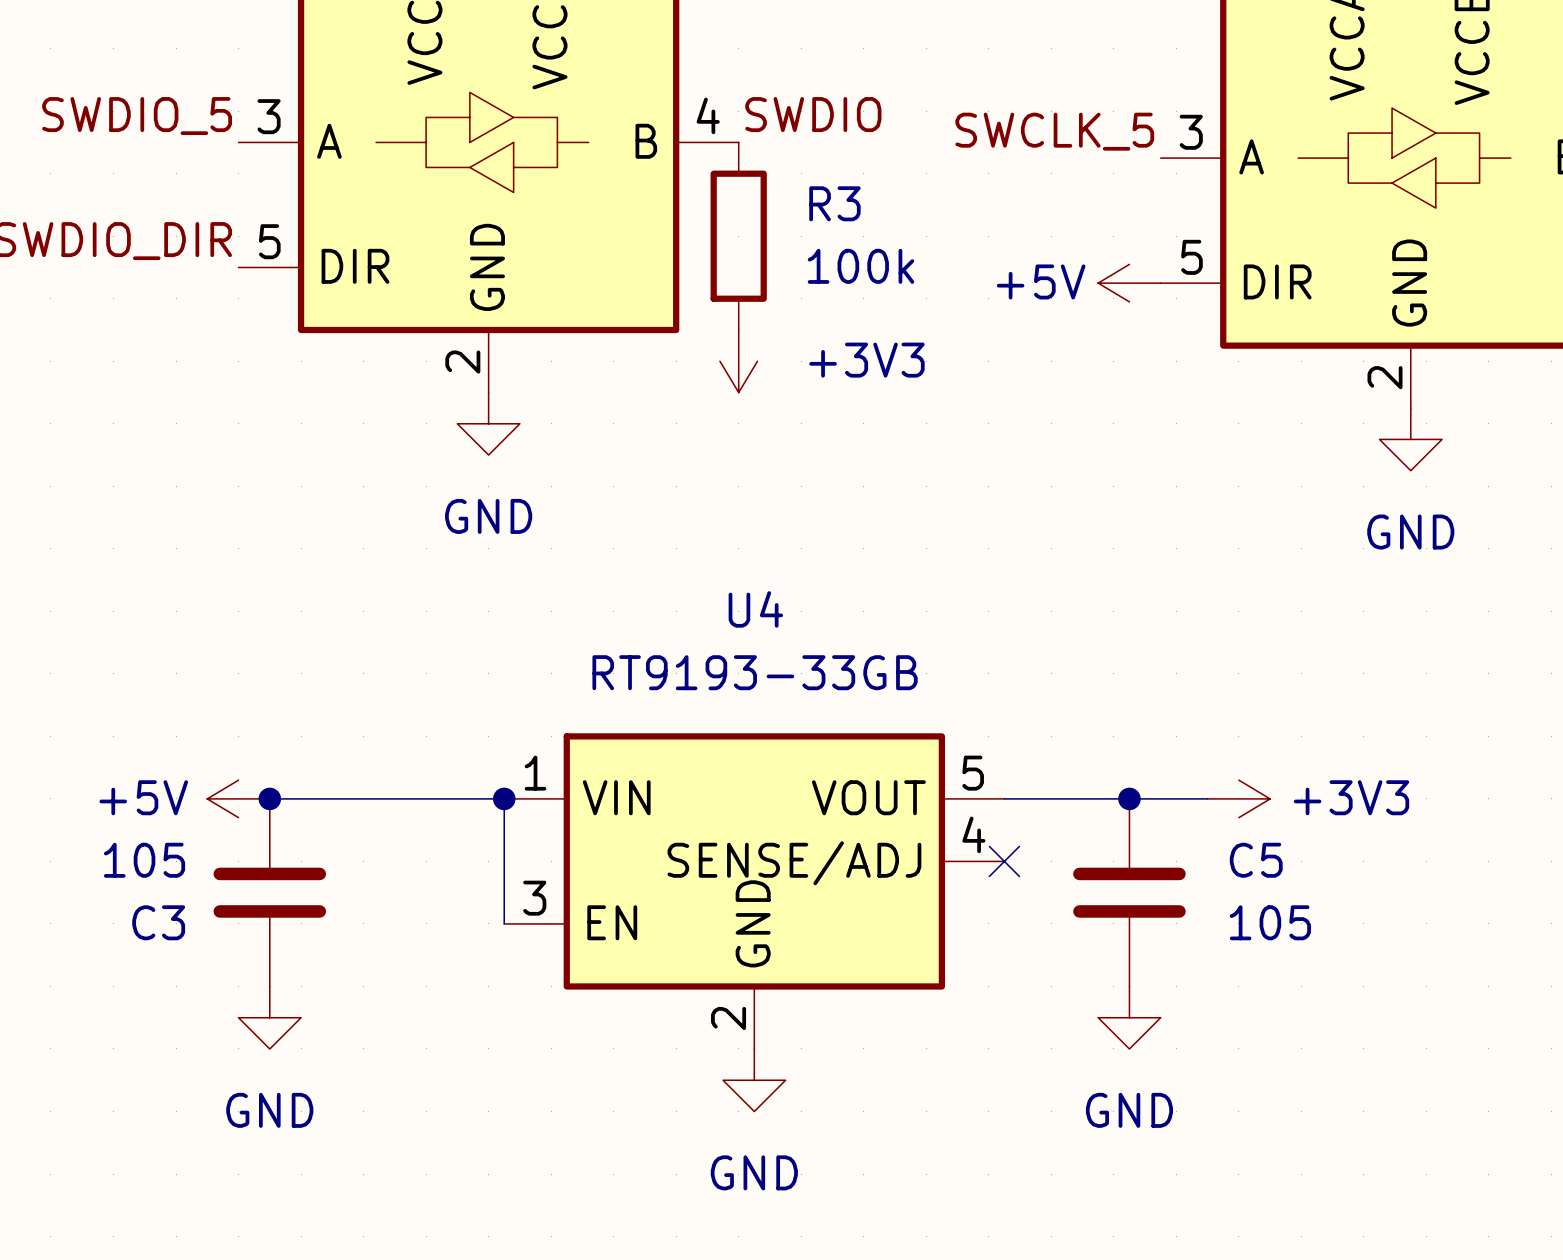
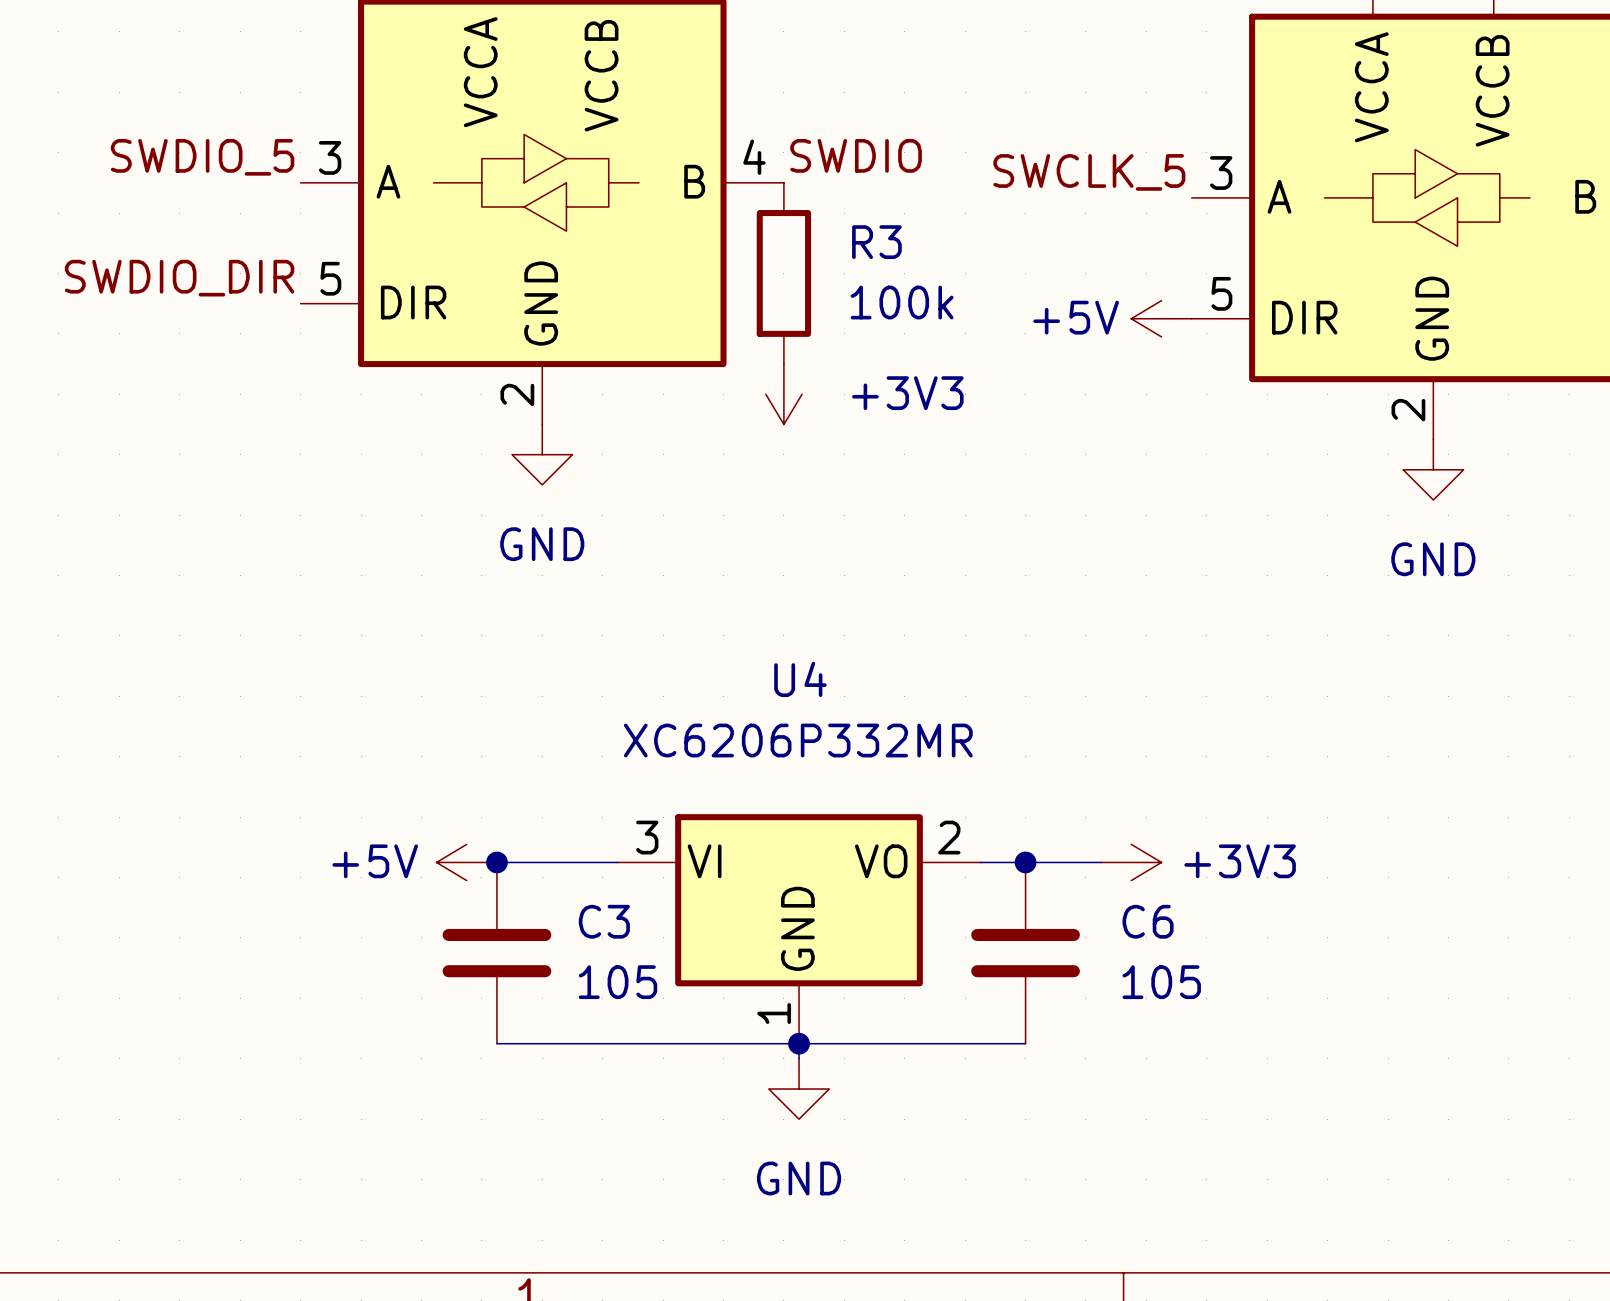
U4 value: RT9193-33GB (755, 672) -> XC6206P332MR (798, 740)
U4 symbol: [504, 733, 1005, 1049] -> [617, 814, 981, 1044]
power symbol position: +5V (238, 798) -> +5V (466, 862)
wire: (269, 798) (504, 798) (504, 923) -> none
junction: (269, 798) -> none
junction position: (504, 798) -> (496, 862)
wire: (1004, 798) (1207, 798) -> none
junction: (1129, 798) -> none
power symbol position: +3V3 (1238, 798) -> +3V3 (1131, 862)
wire: none -> (496, 862) (617, 862)
wire: none -> (980, 862) (1101, 862)
junction: none -> (1025, 862)
C3 value position: 105 (144, 860) -> 105 (618, 982)
no-connect mark: (1004, 861) -> none
C3 position: (269, 892) -> (496, 953)
C5: 105 (1129, 892) -> none
C3 name position: C3 (158, 922) -> C3 (604, 921)
C6: none -> 105 (1025, 953)
power symbol: GND (269, 1017) -> none
power symbol: GND (1129, 1017) -> none
wire: none -> (496, 1043) (1025, 1043)
junction: none -> (799, 1043)

